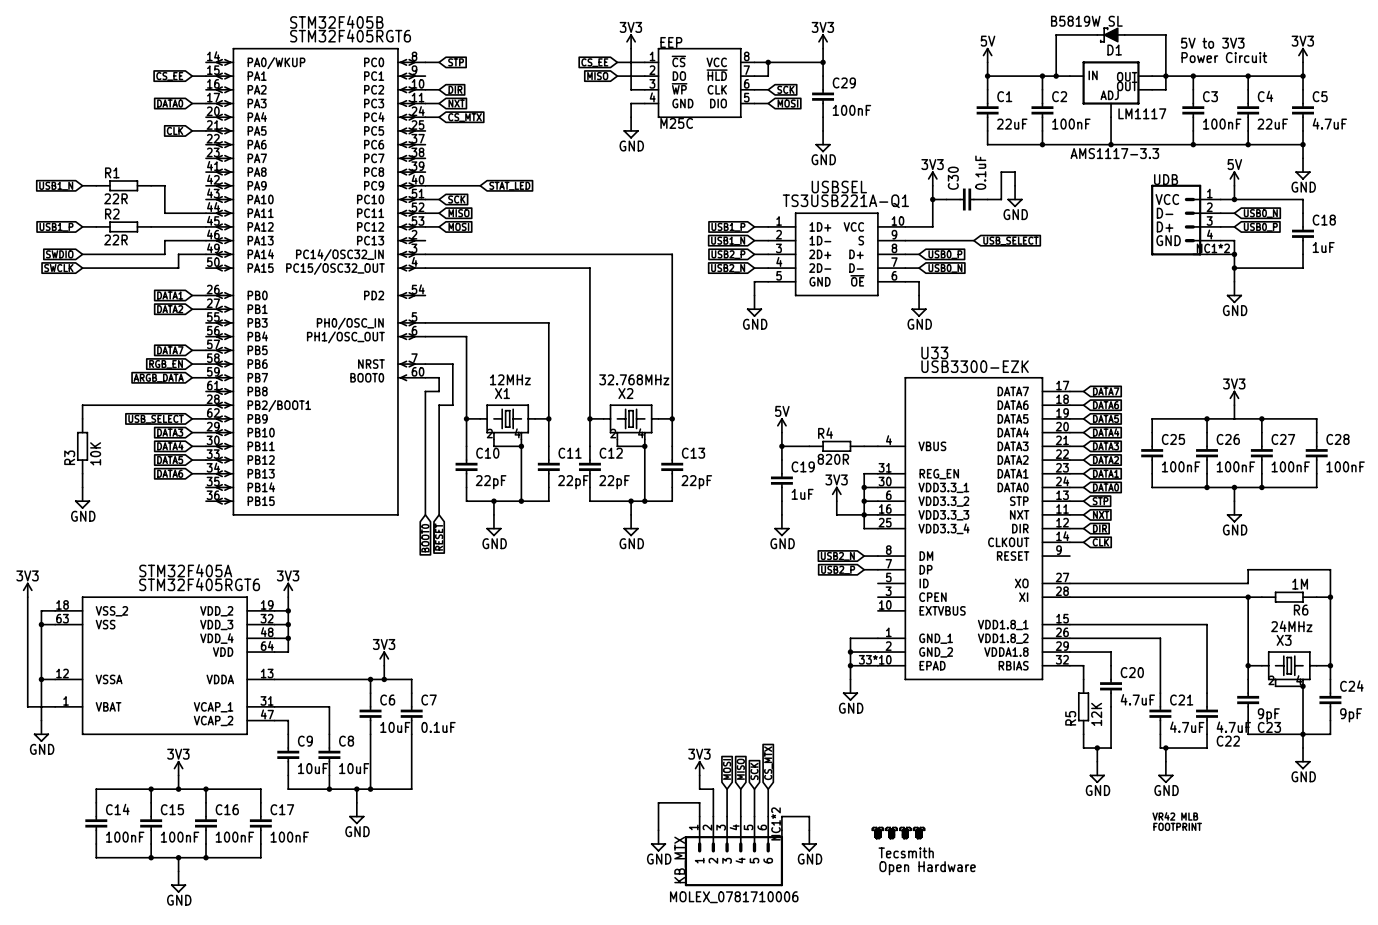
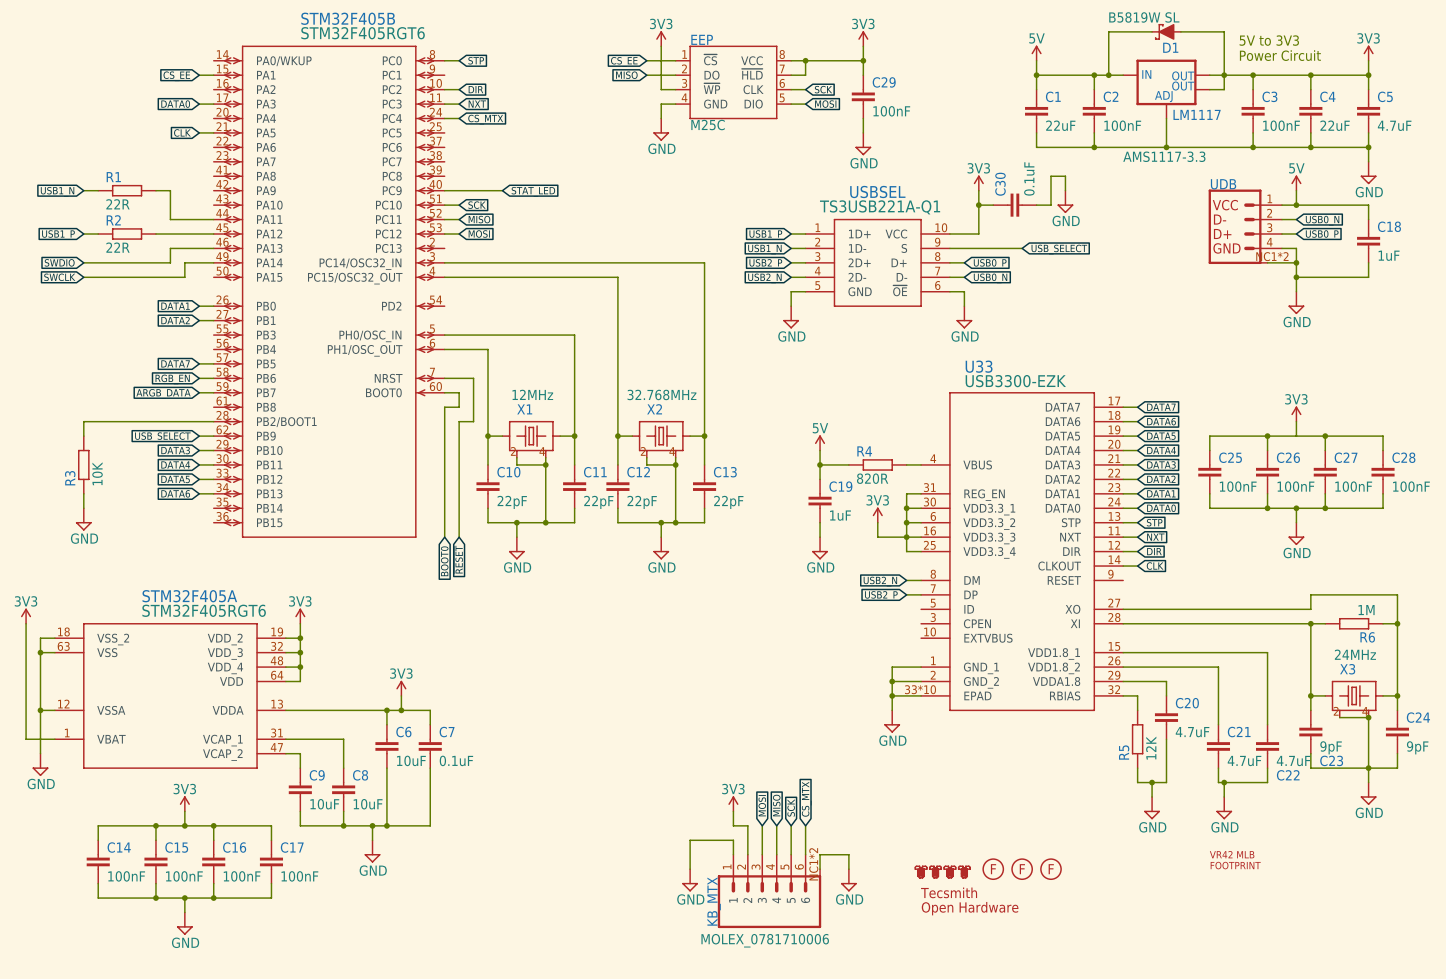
part: none -> (993, 869)
part: none -> (1022, 869)
part: none -> (1051, 869)

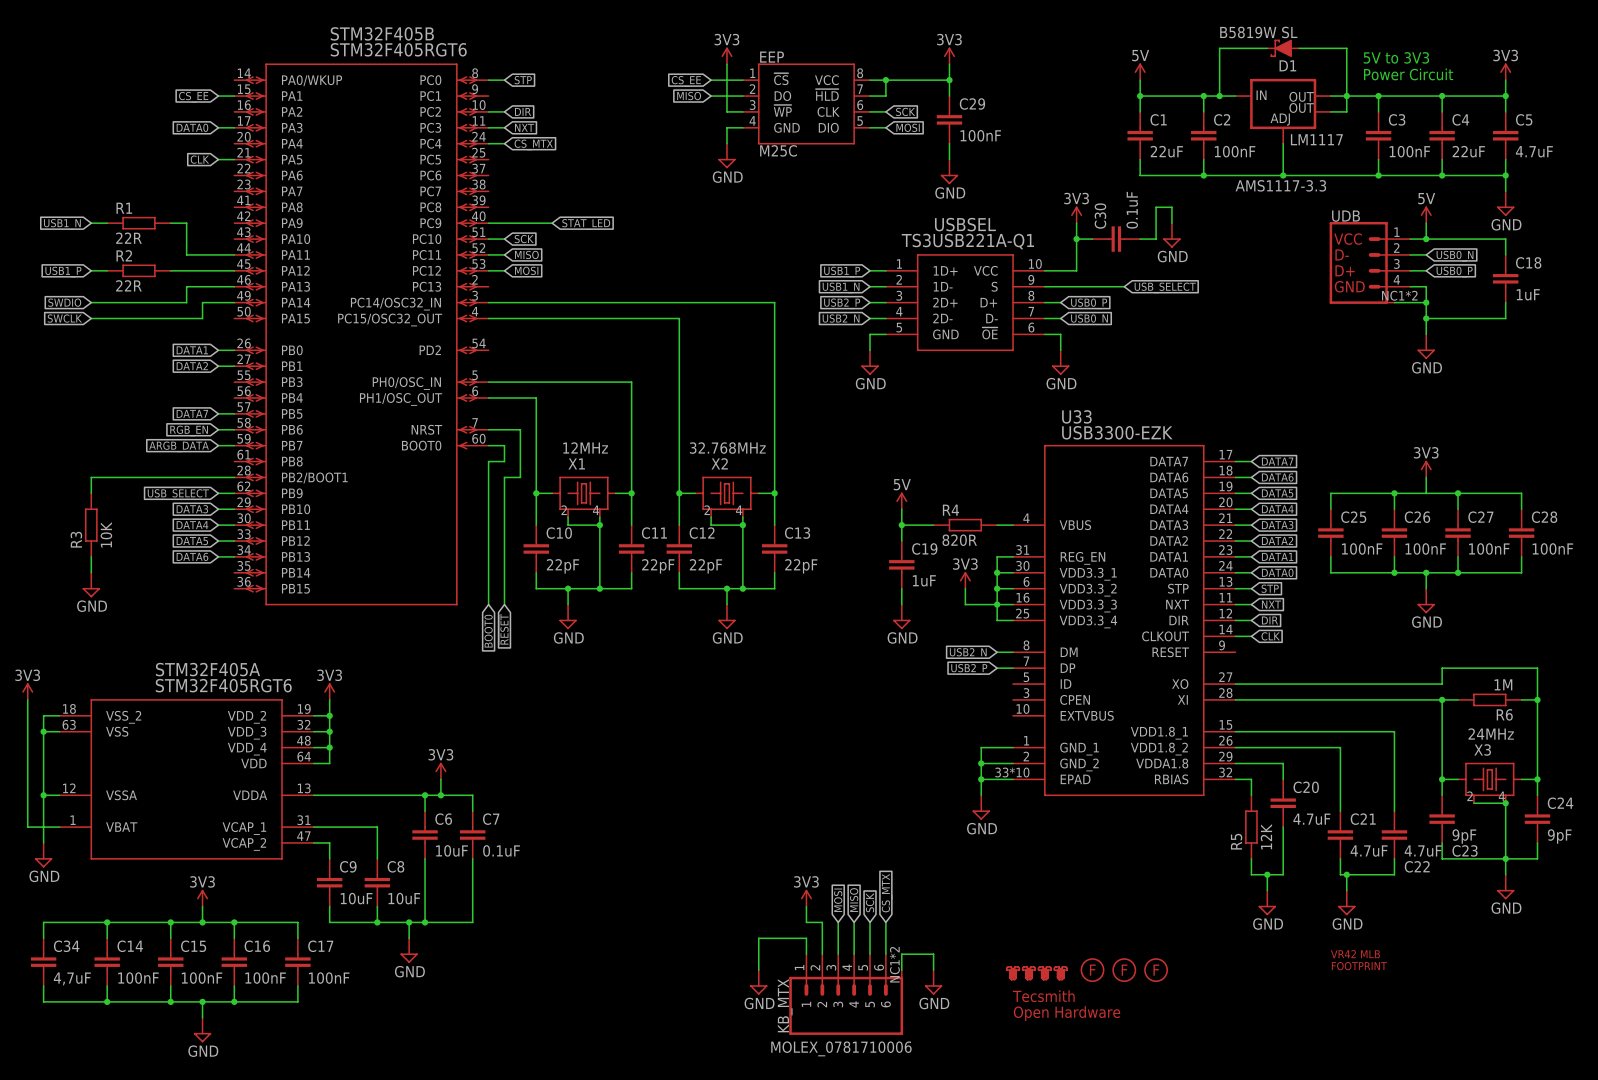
wire: none -> (107, 922) (43, 922) (43, 938)
junction: none -> (107, 922)
C34: none -> 4,7uF (43, 962)
wire: none -> (43, 985) (43, 1001) (107, 1001)
junction: none -> (107, 1001)

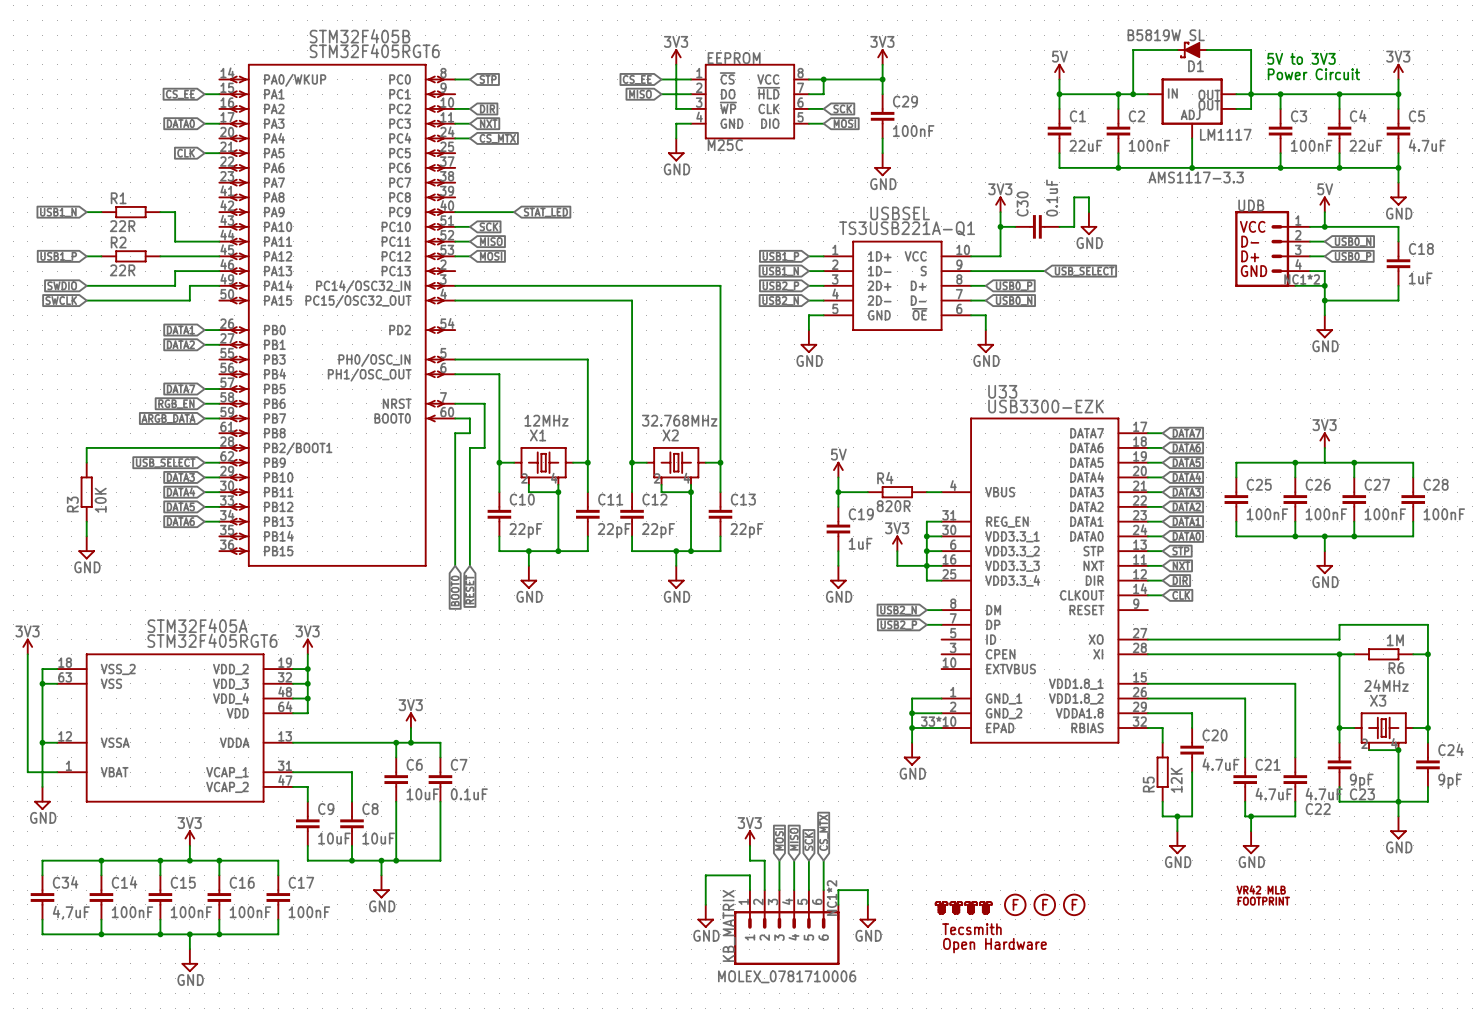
EEP name: EEP (772, 57) -> EEPROM (734, 58)
KB_MTX name: KB_MTX (785, 1005) -> KB_MATRIX (729, 925)

